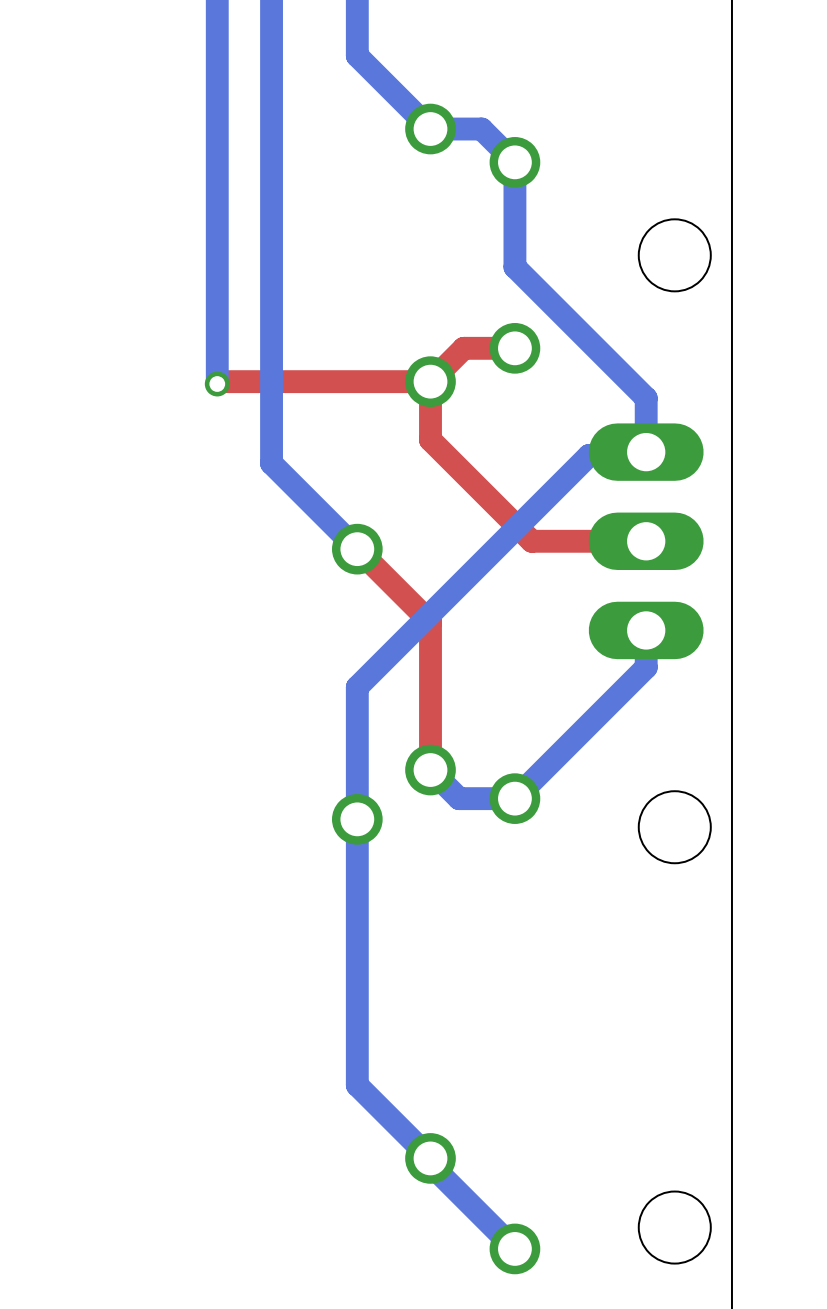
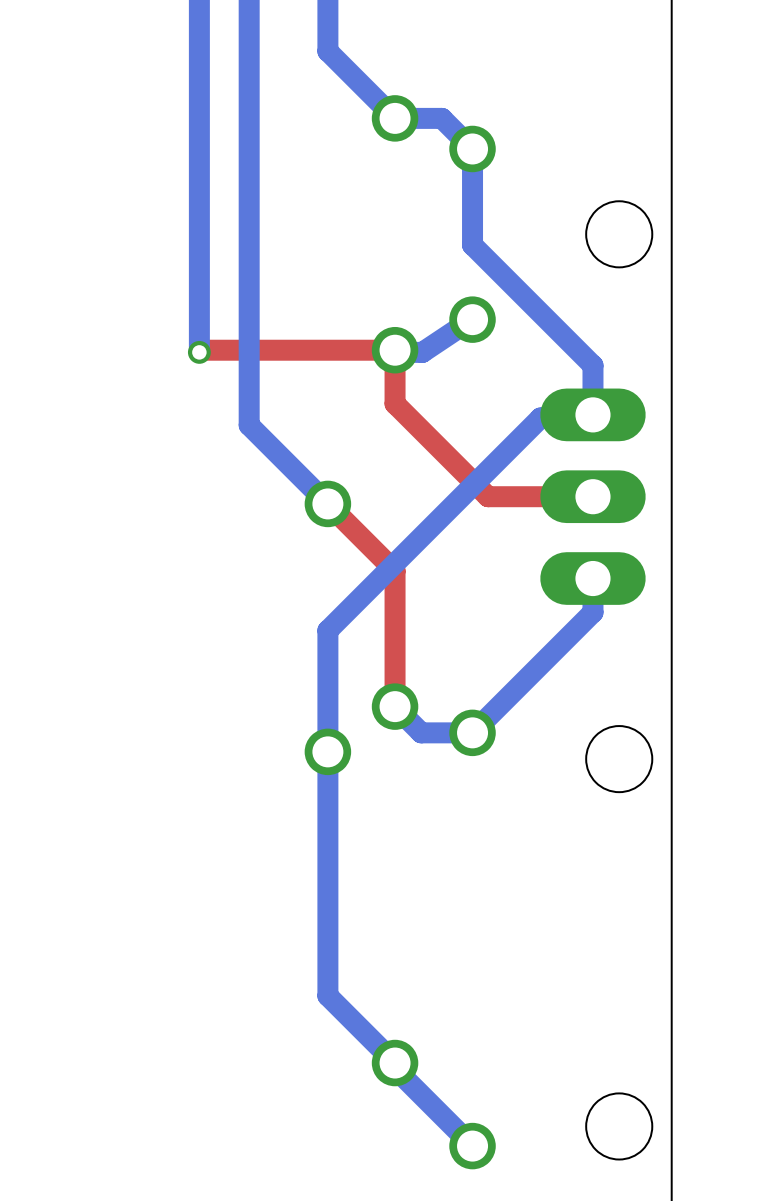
top track: (514, 348) (463, 348) (430, 381) -> none
bottom track: none -> (461, 326) (422, 352) (396, 352)

